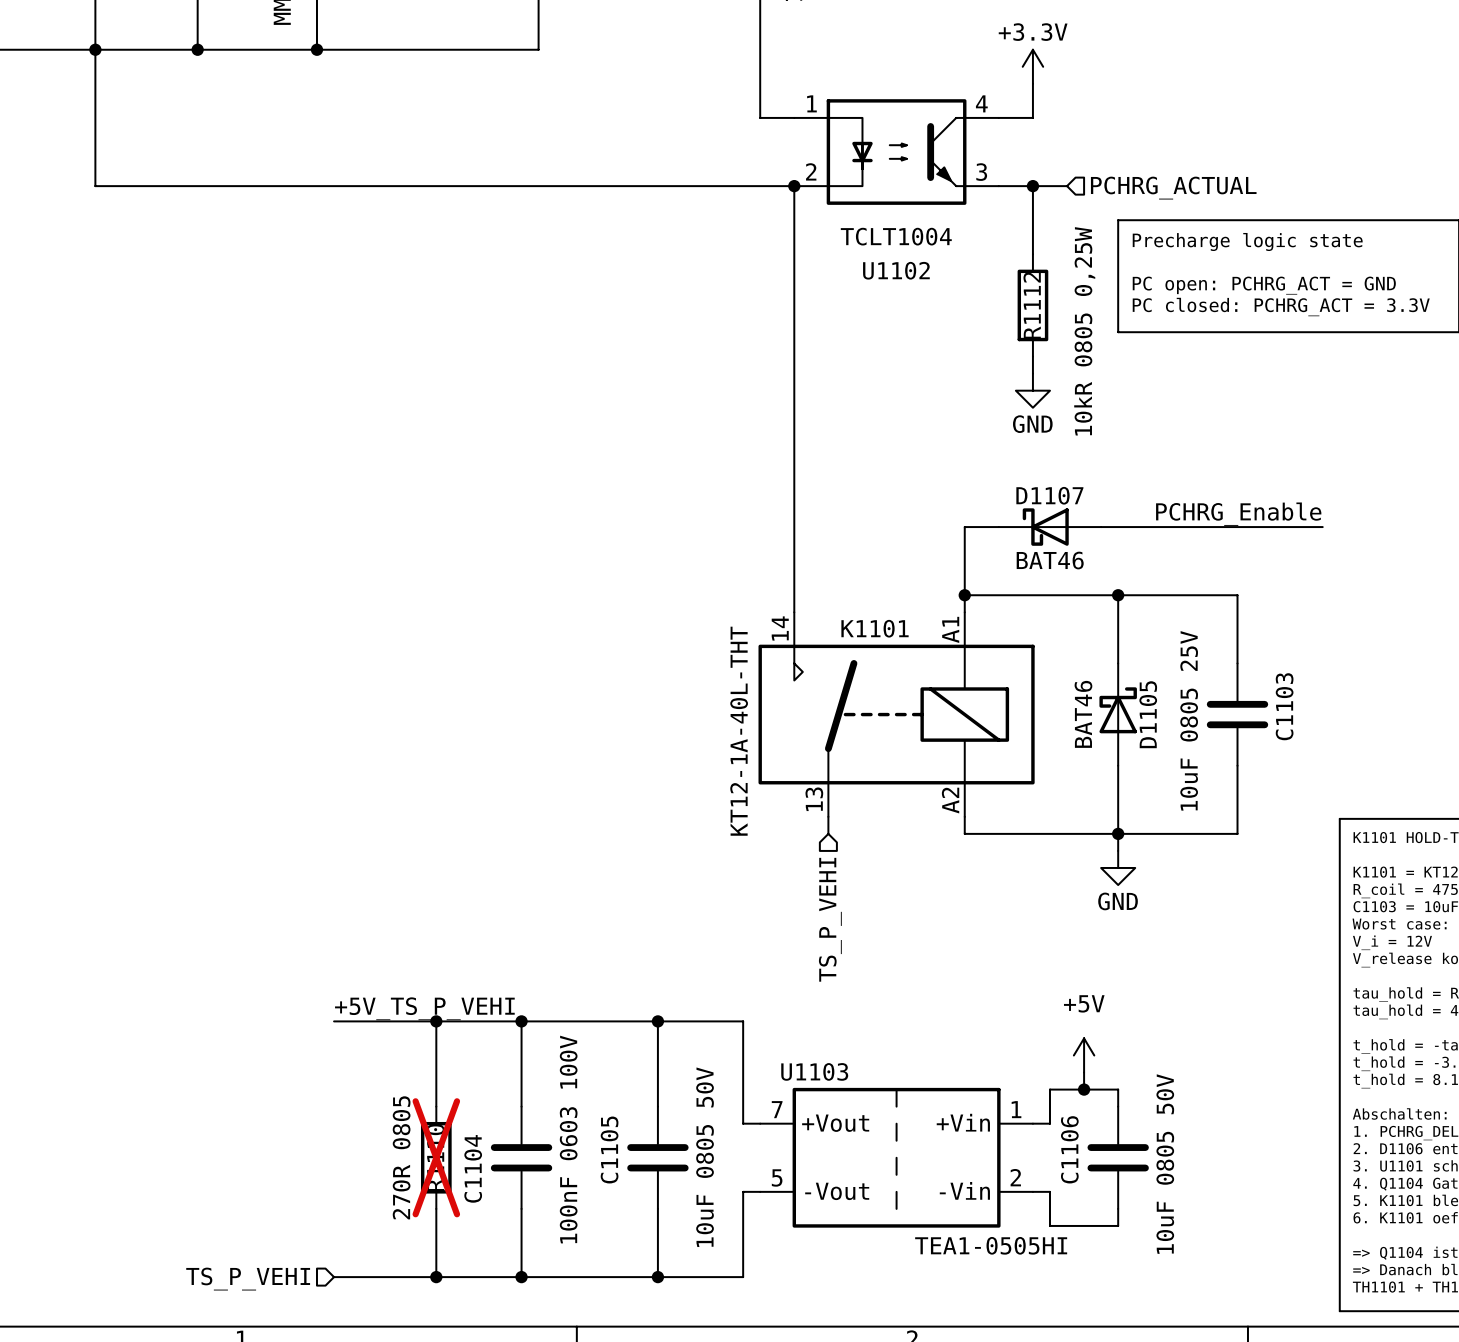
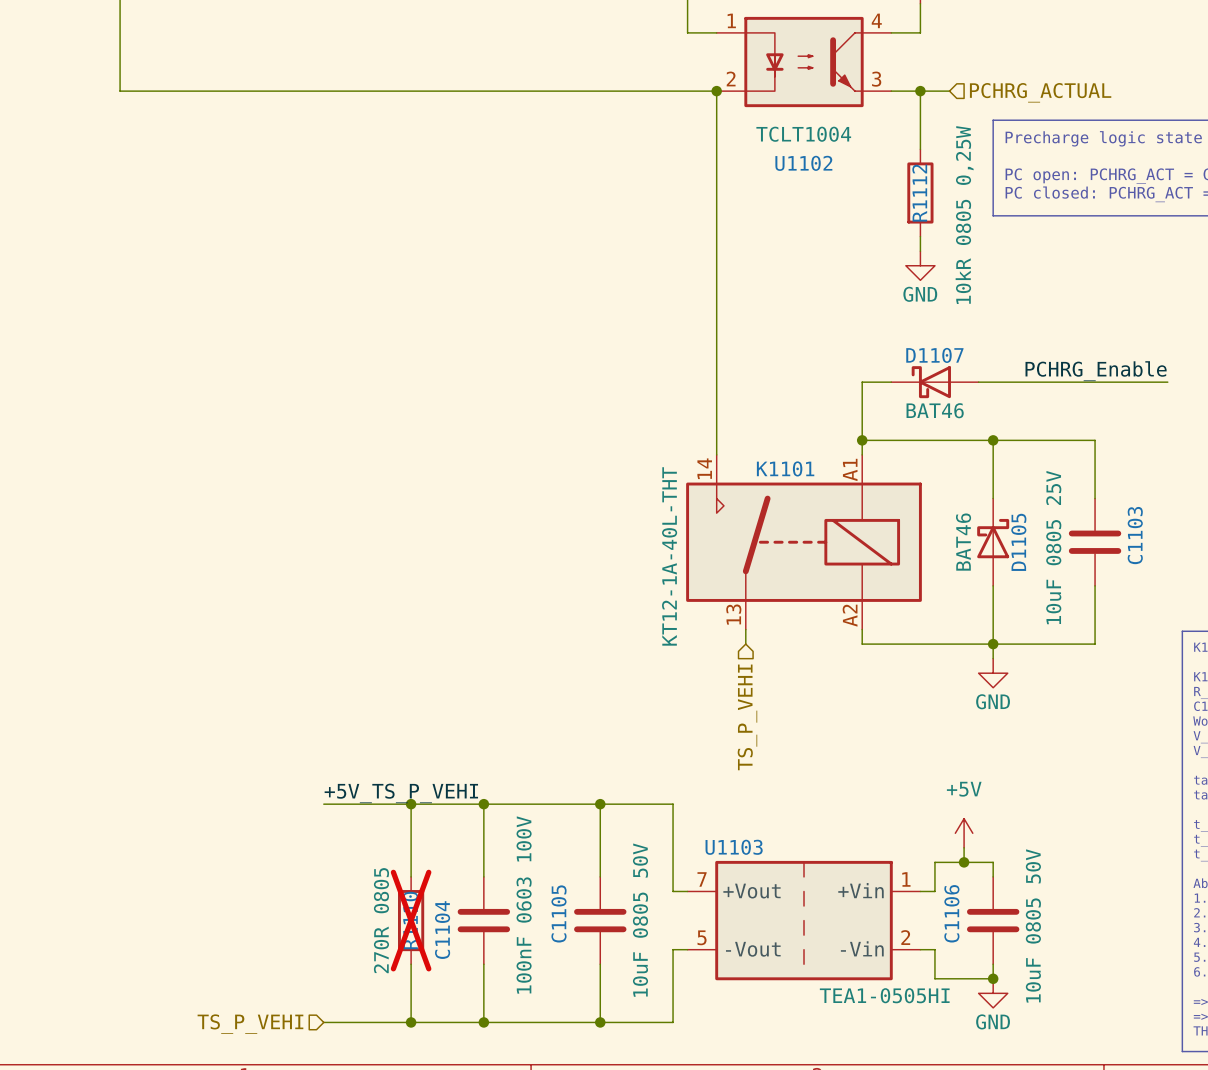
junction: none -> (993, 978)
power symbol: none -> GND (993, 993)

